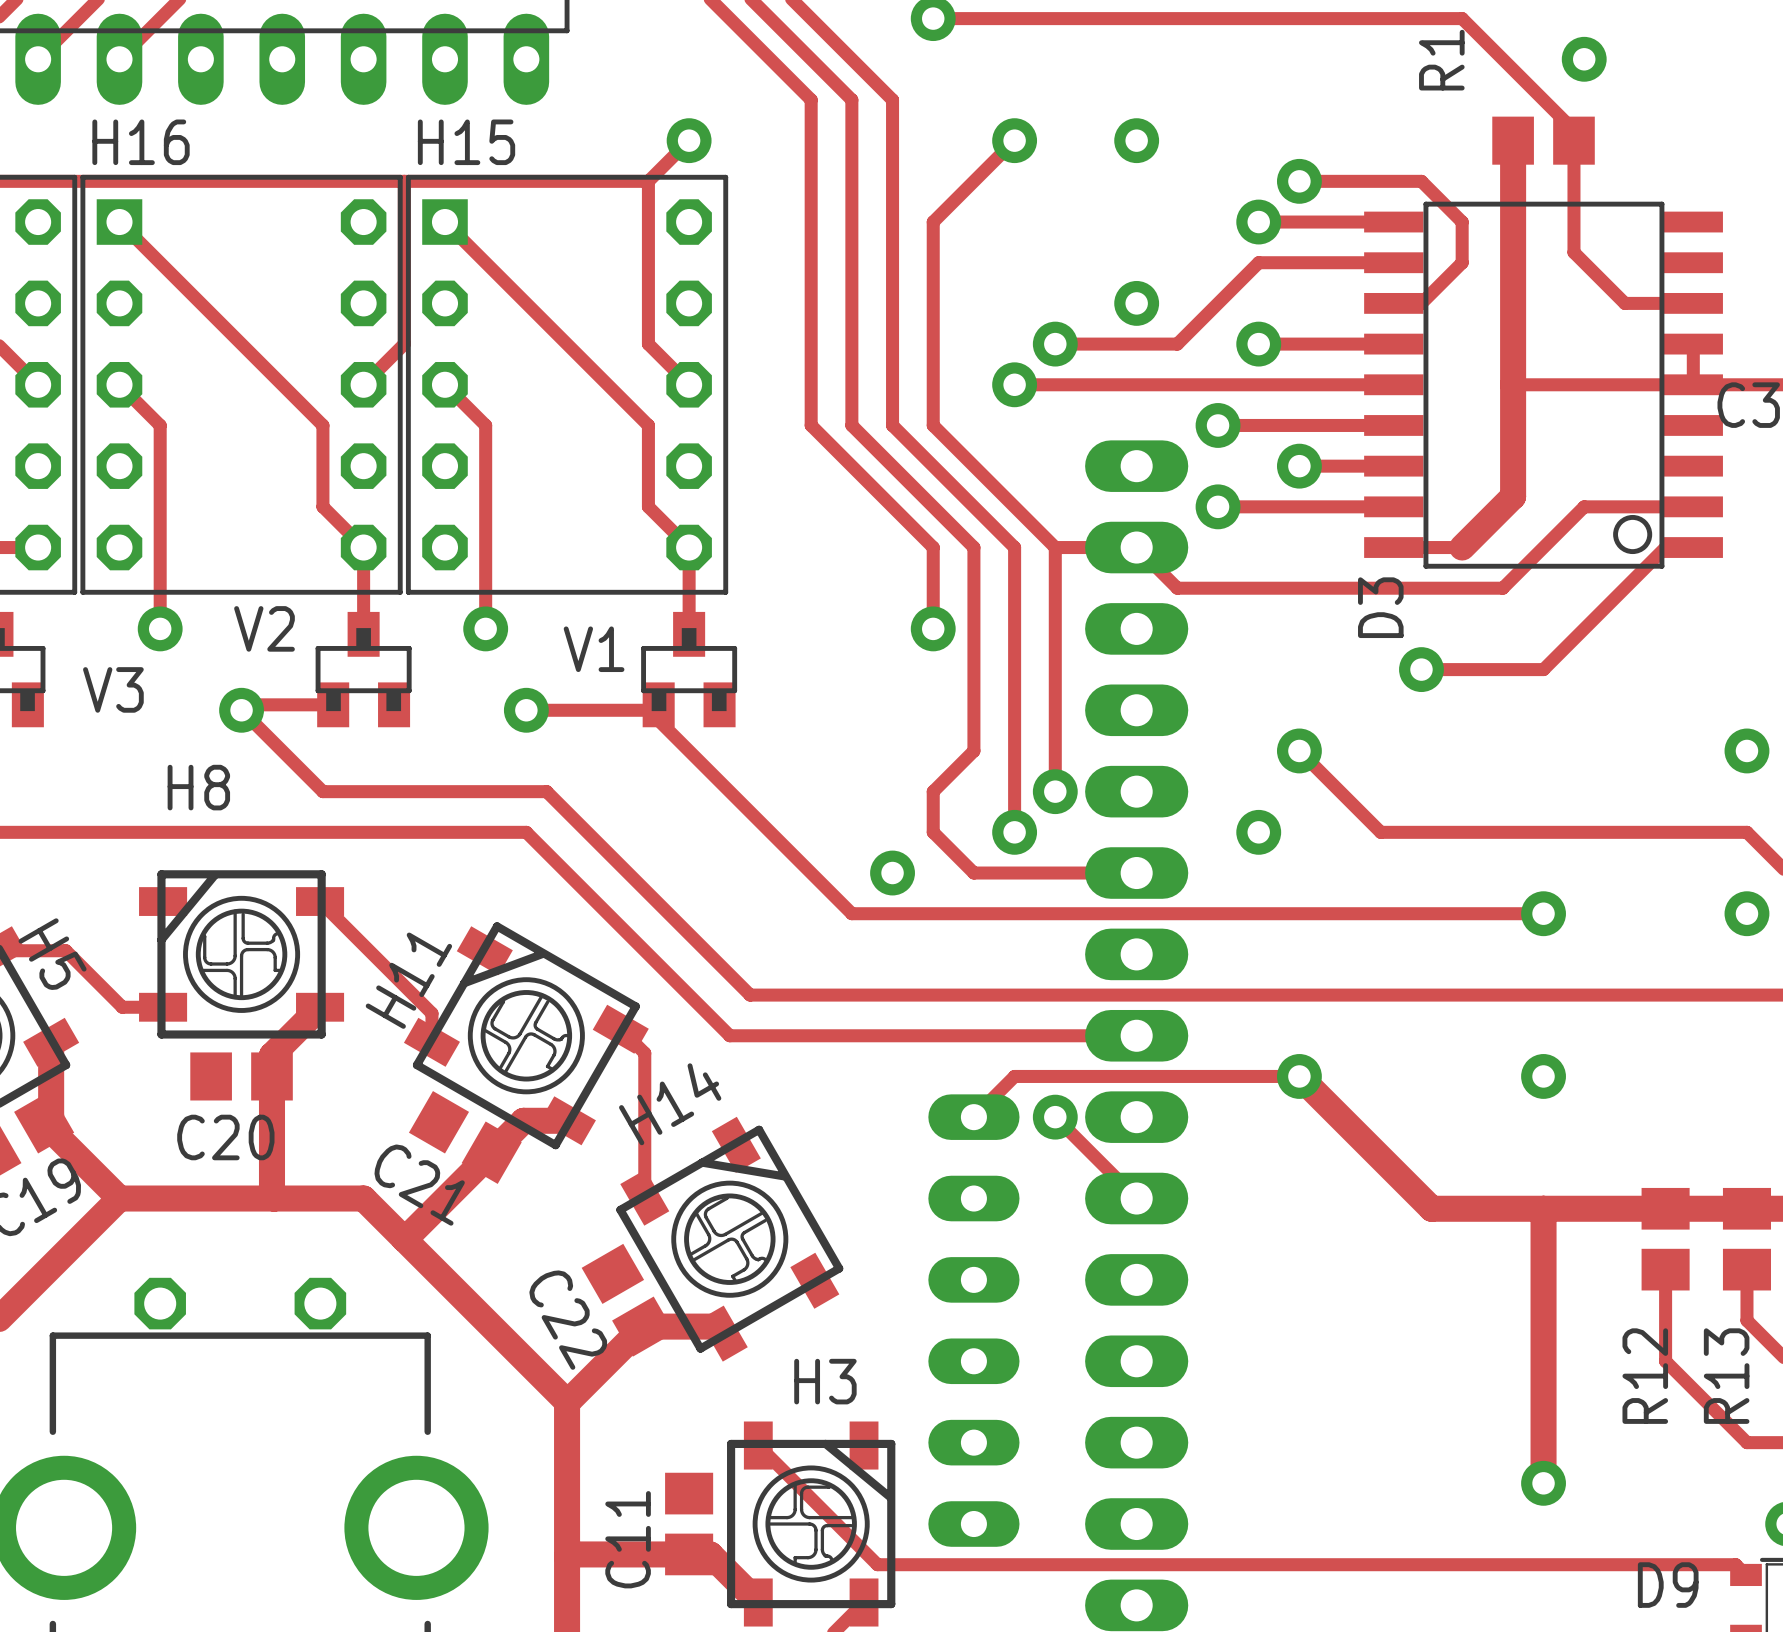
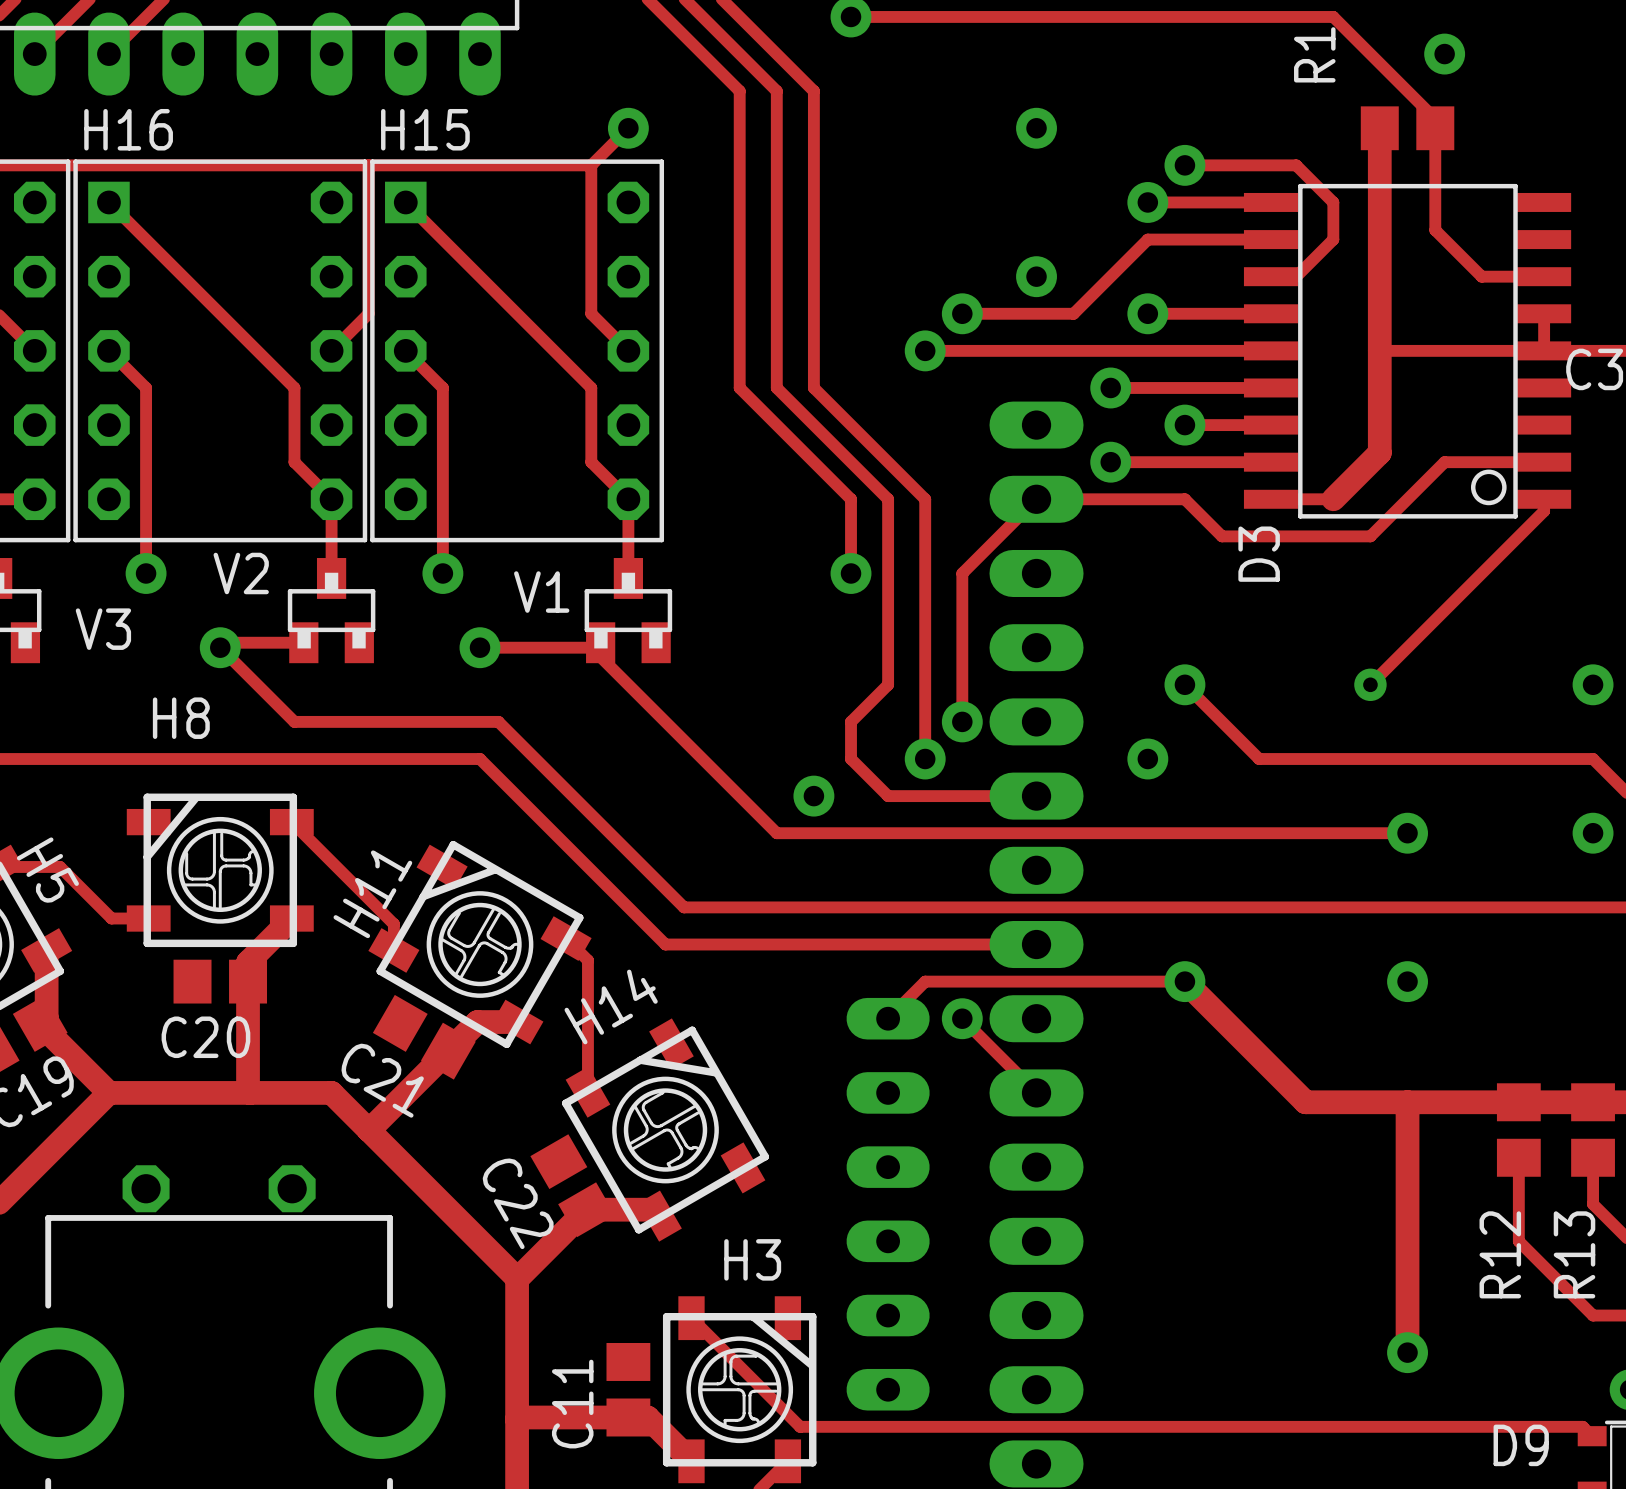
track: (1014, 140) (933, 222) (933, 425) (1055, 547) -> none
via: (1014, 140) -> none
track: (1055, 547) (1136, 547) (1177, 588) (1340, 588) -> (962, 573) (1036, 499) (1184, 499) (1222, 536)
track: (1055, 547) (1055, 628) -> none
track: (1693, 547) (1665, 547) (1543, 669) (1421, 669) -> (1544, 499) (1544, 511) (1370, 684)
via: (1421, 669) -> none
via: none -> (1370, 684)

